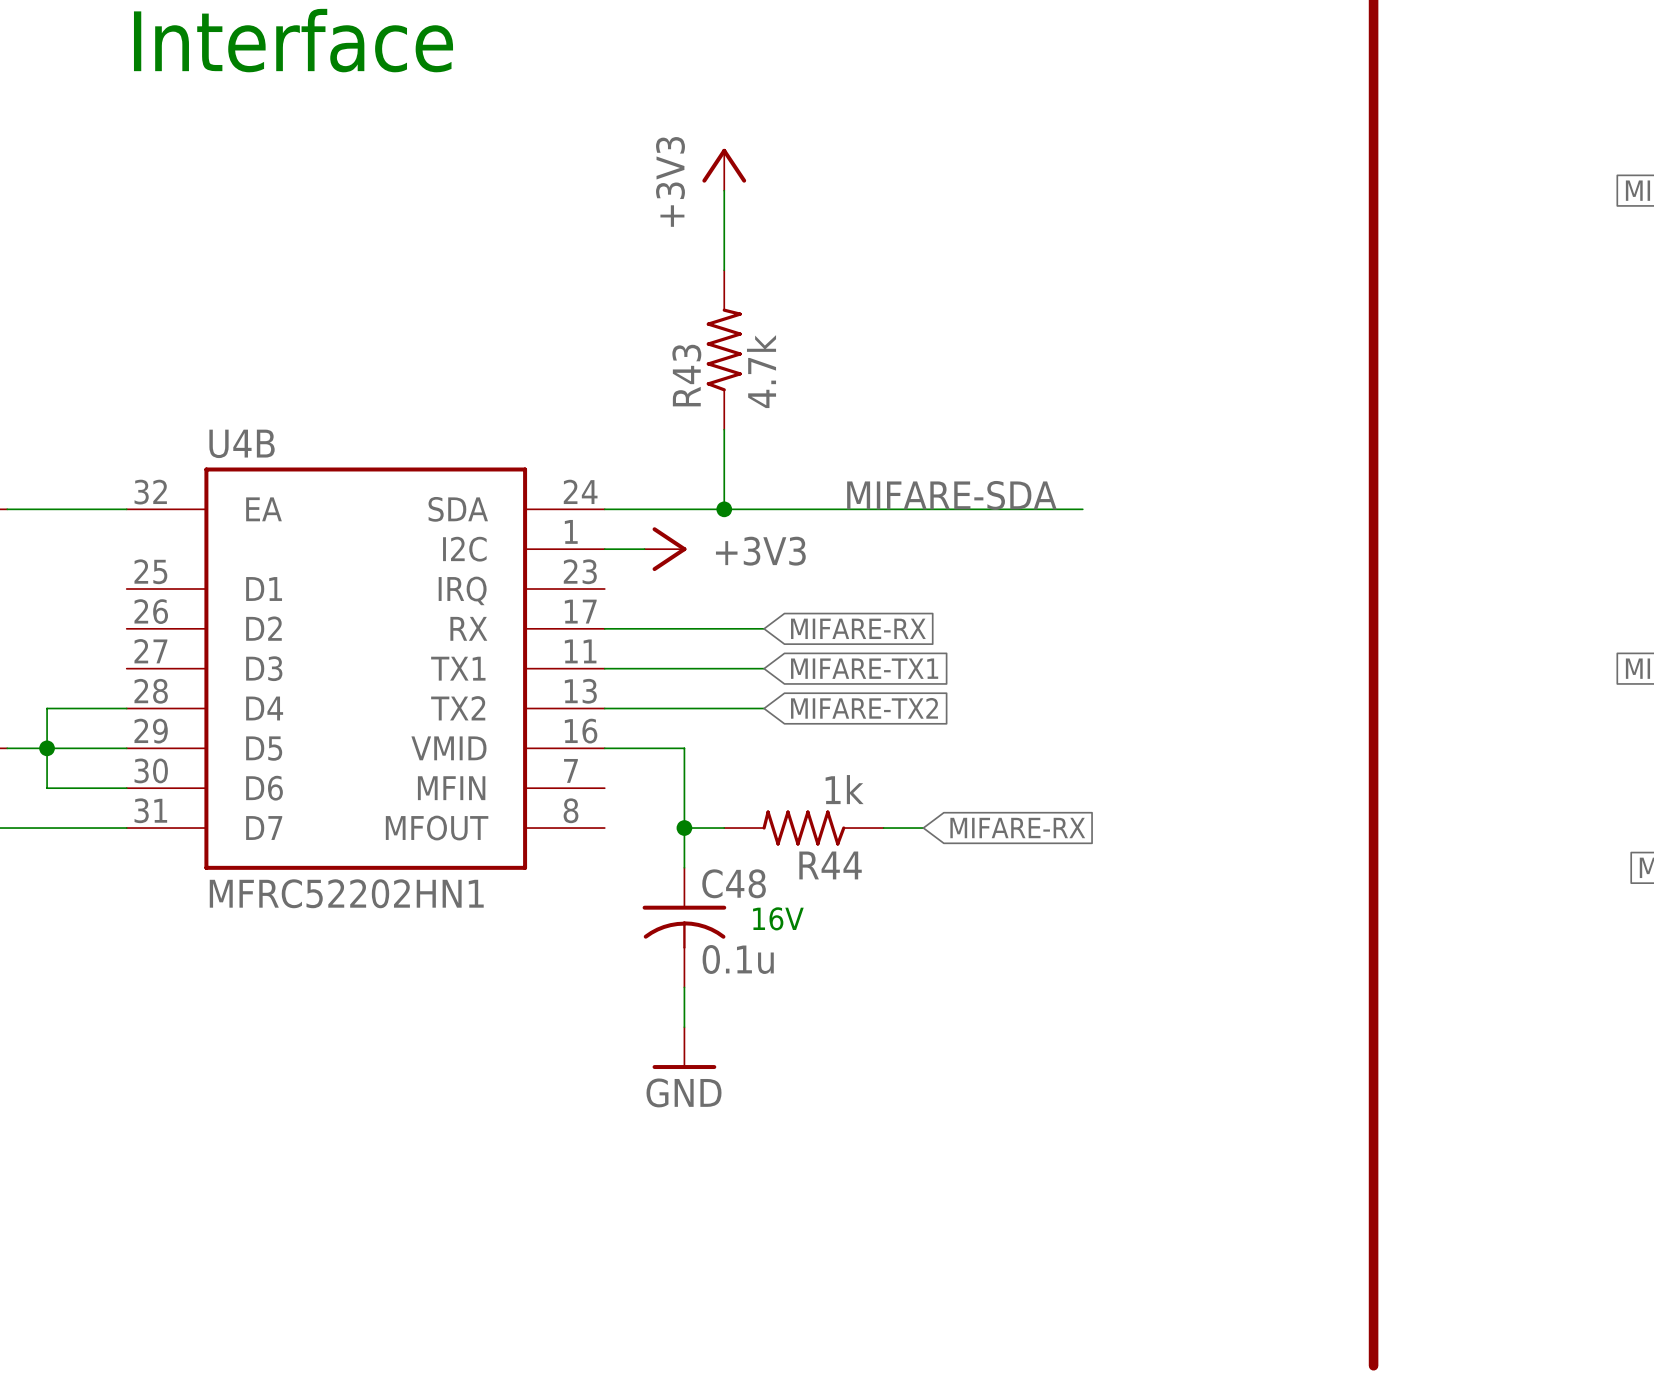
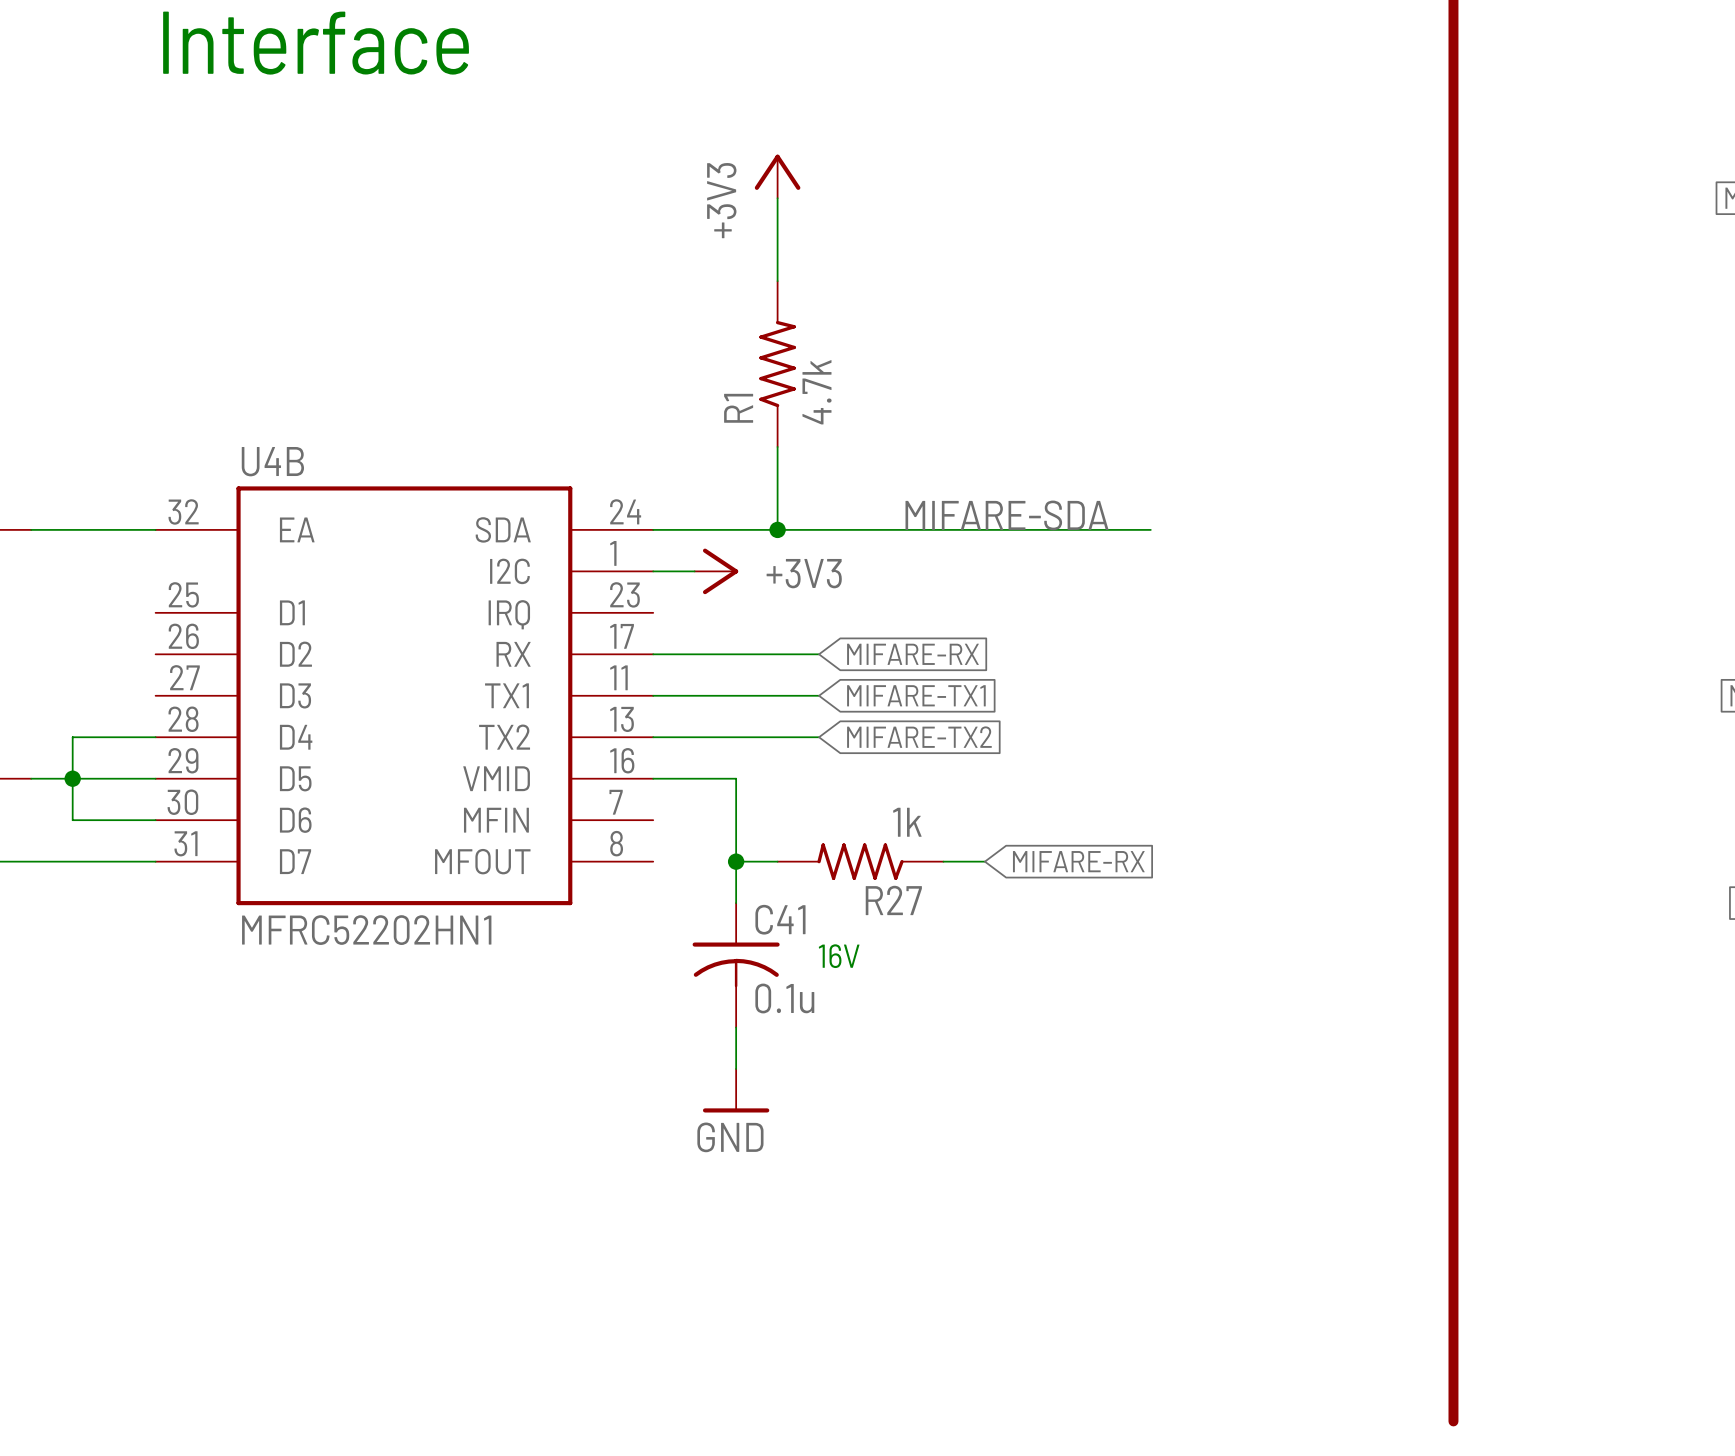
R43 name: R43 (686, 375) -> R1 (738, 408)
R44 name: R44 (830, 865) -> R27 (893, 900)
C48 name: C48 (734, 883) -> C41 (780, 919)

